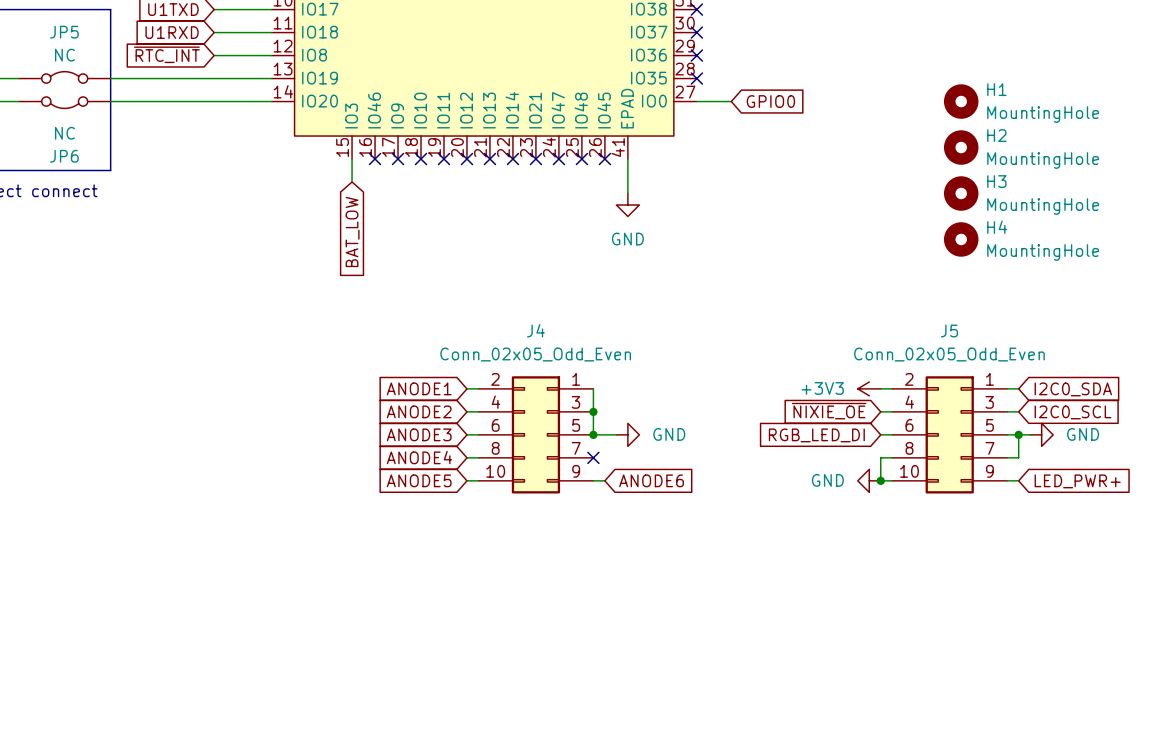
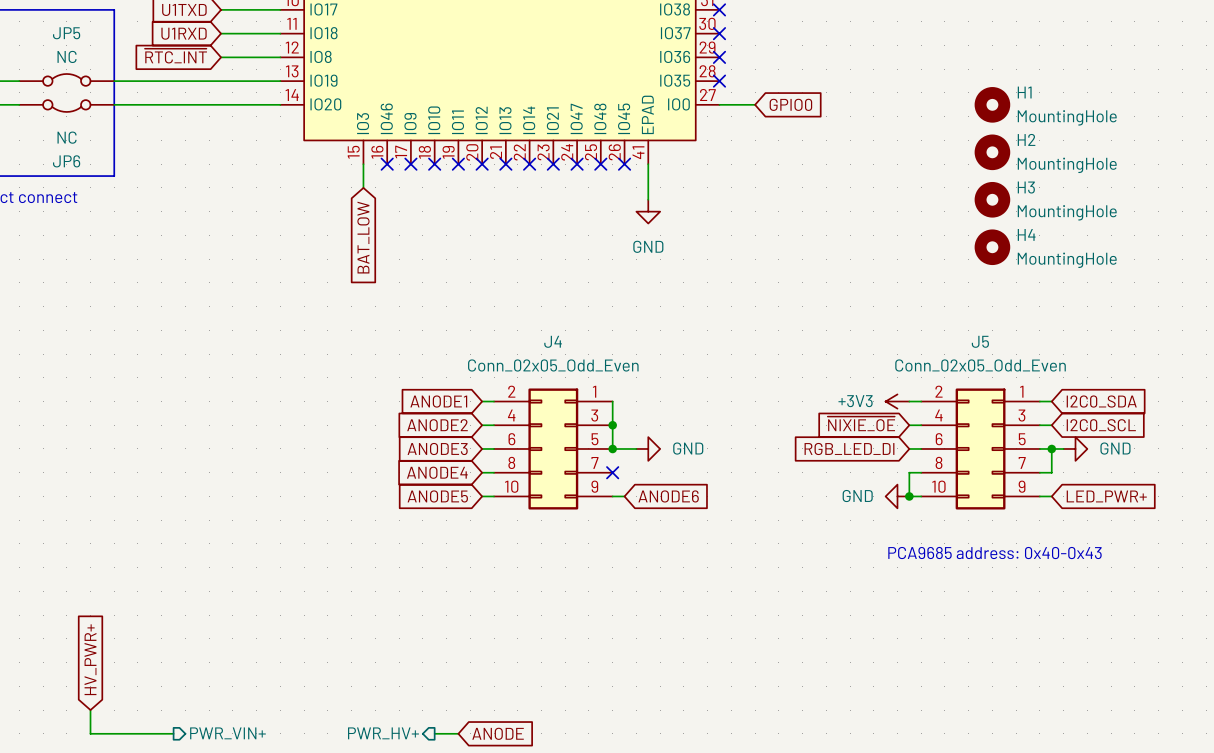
text: none -> PCA9685 address: 0x40-0x43 (994, 553)
global label: none -> HV_PWR+ (90, 659)
wire: none -> (90, 710) (90, 733) (173, 733)
sheet pin: none -> PWR_VIN+ (227, 733)
sheet pin: none -> PWR_HV+ (383, 733)
wire: none -> (434, 733) (458, 733)
global label: none -> ANODE (498, 733)

